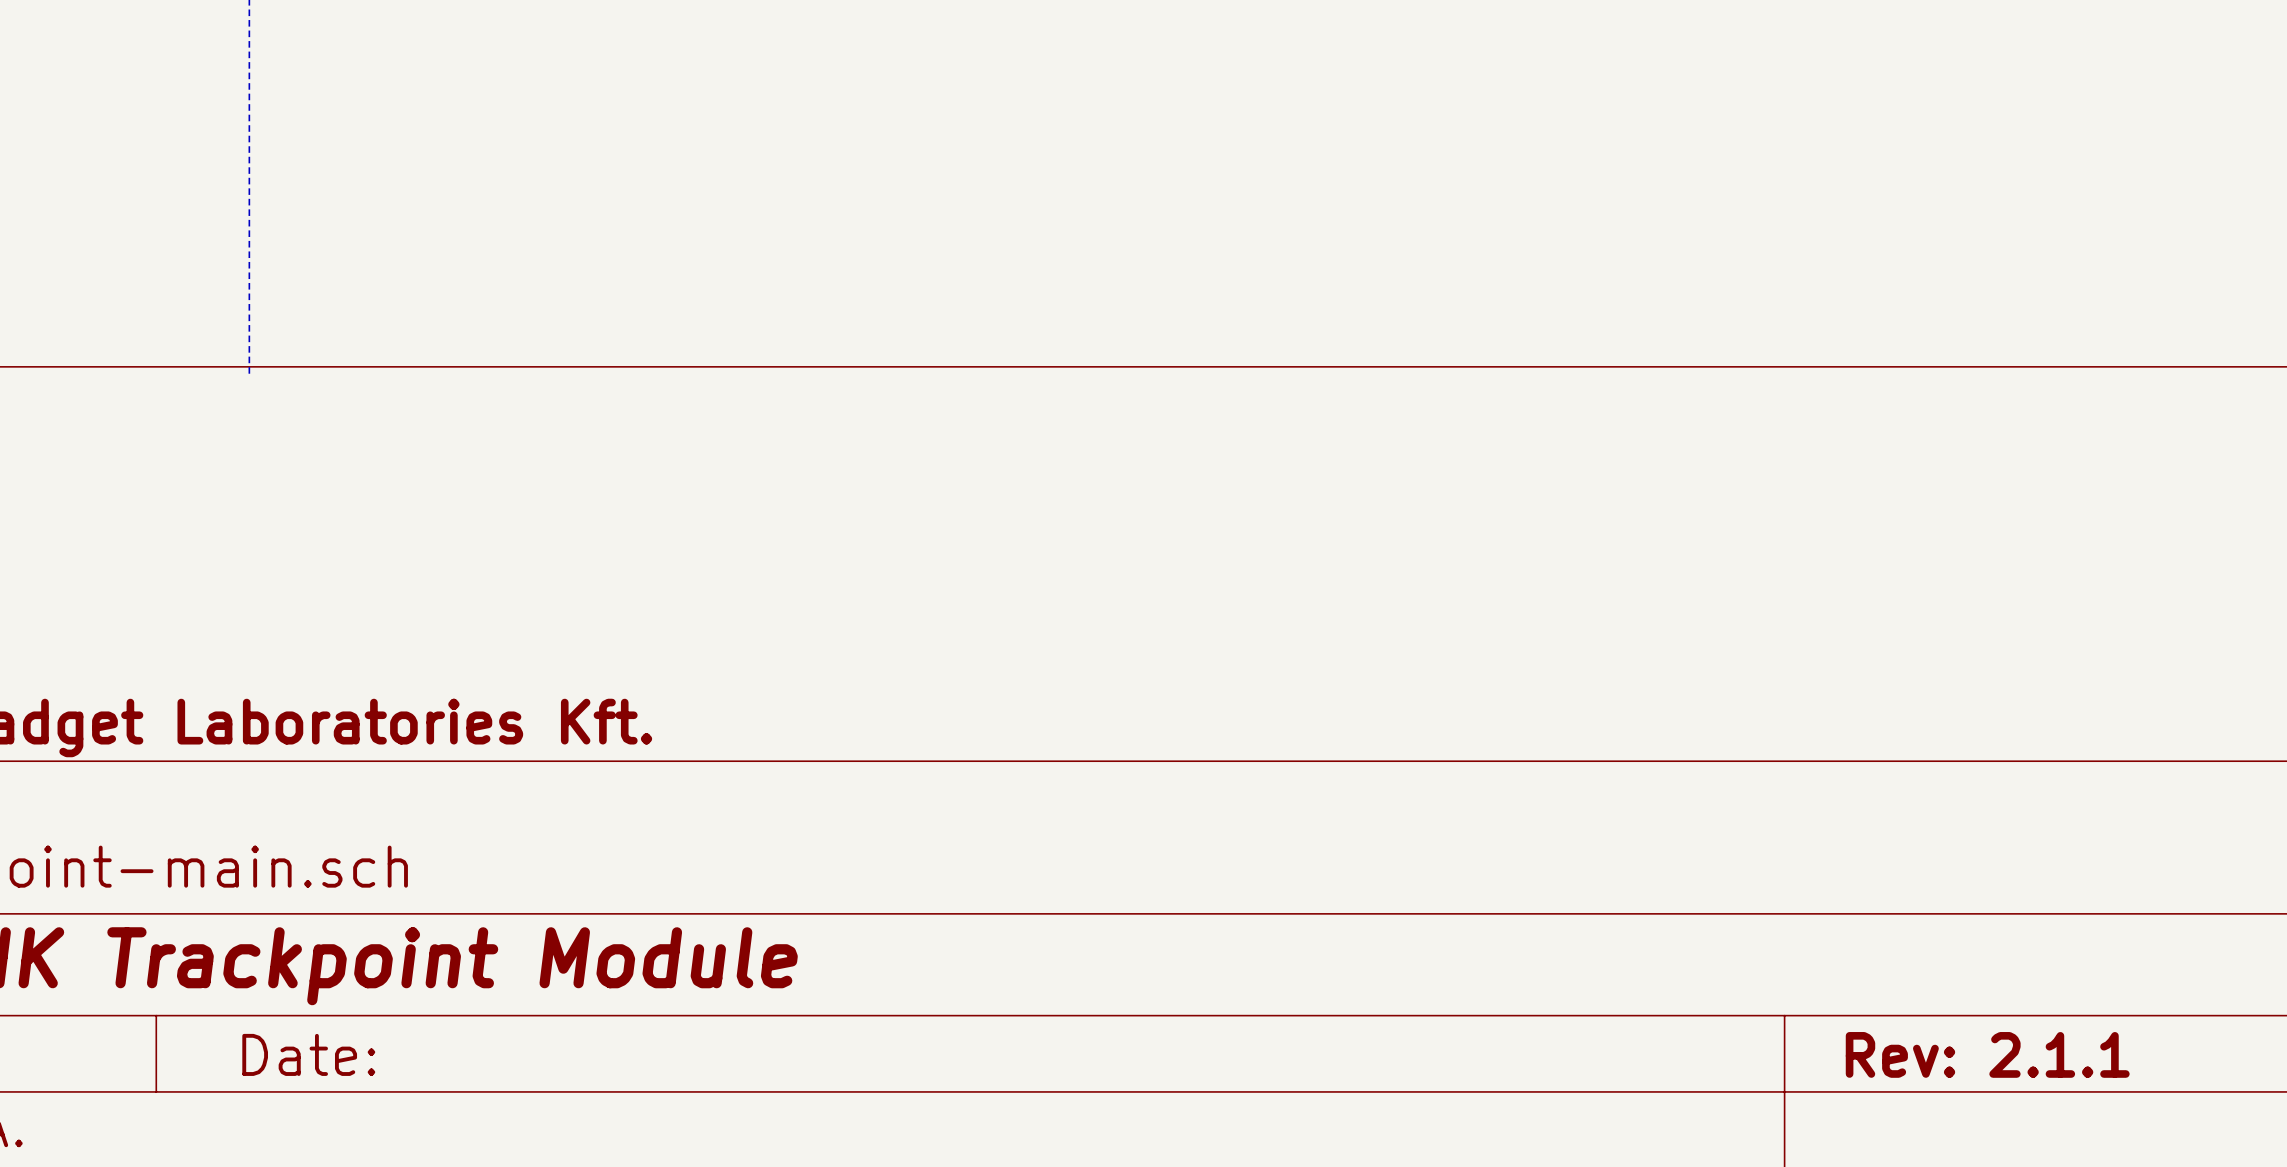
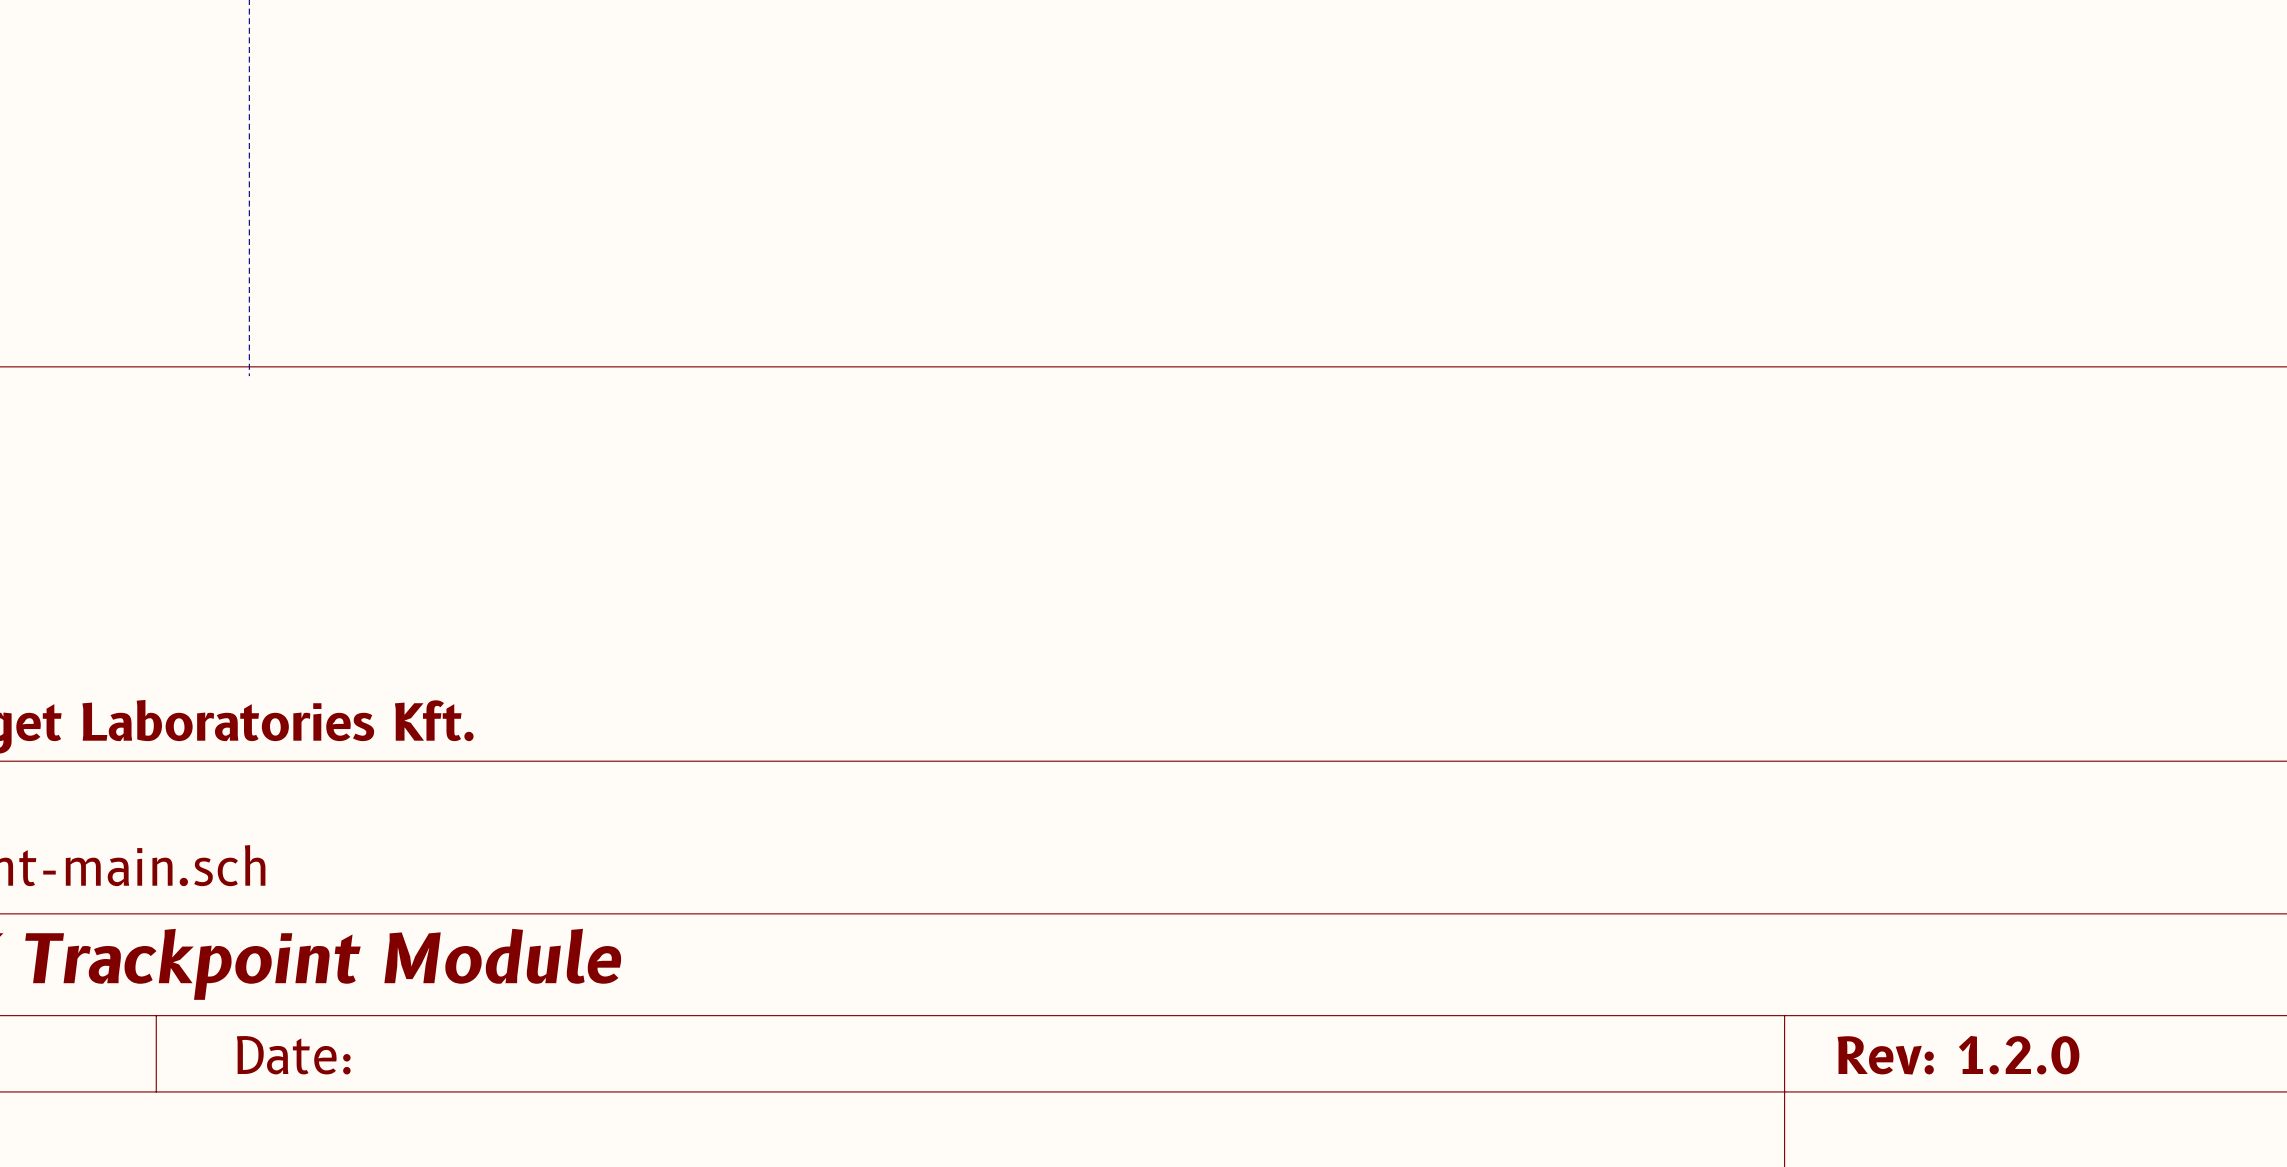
title block: Rev: 2.1.1 (1987, 1054) -> Rev: 1.2.0 (1958, 1055)

